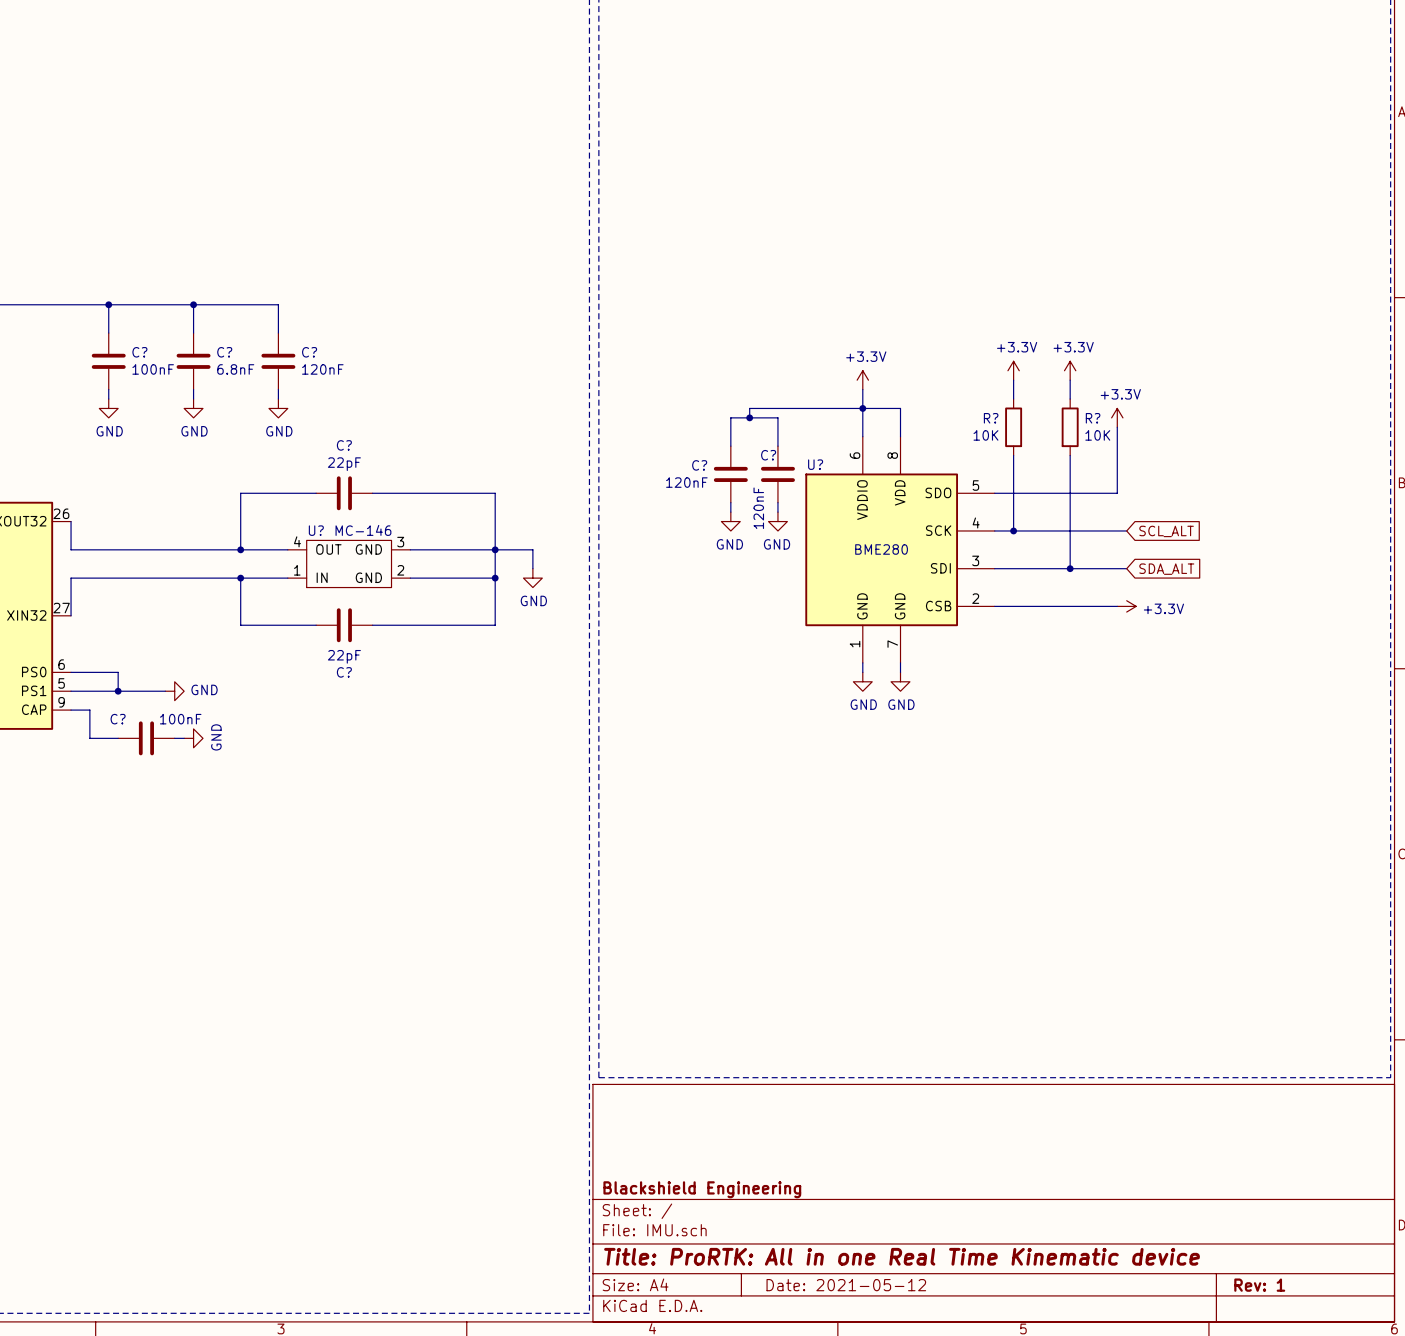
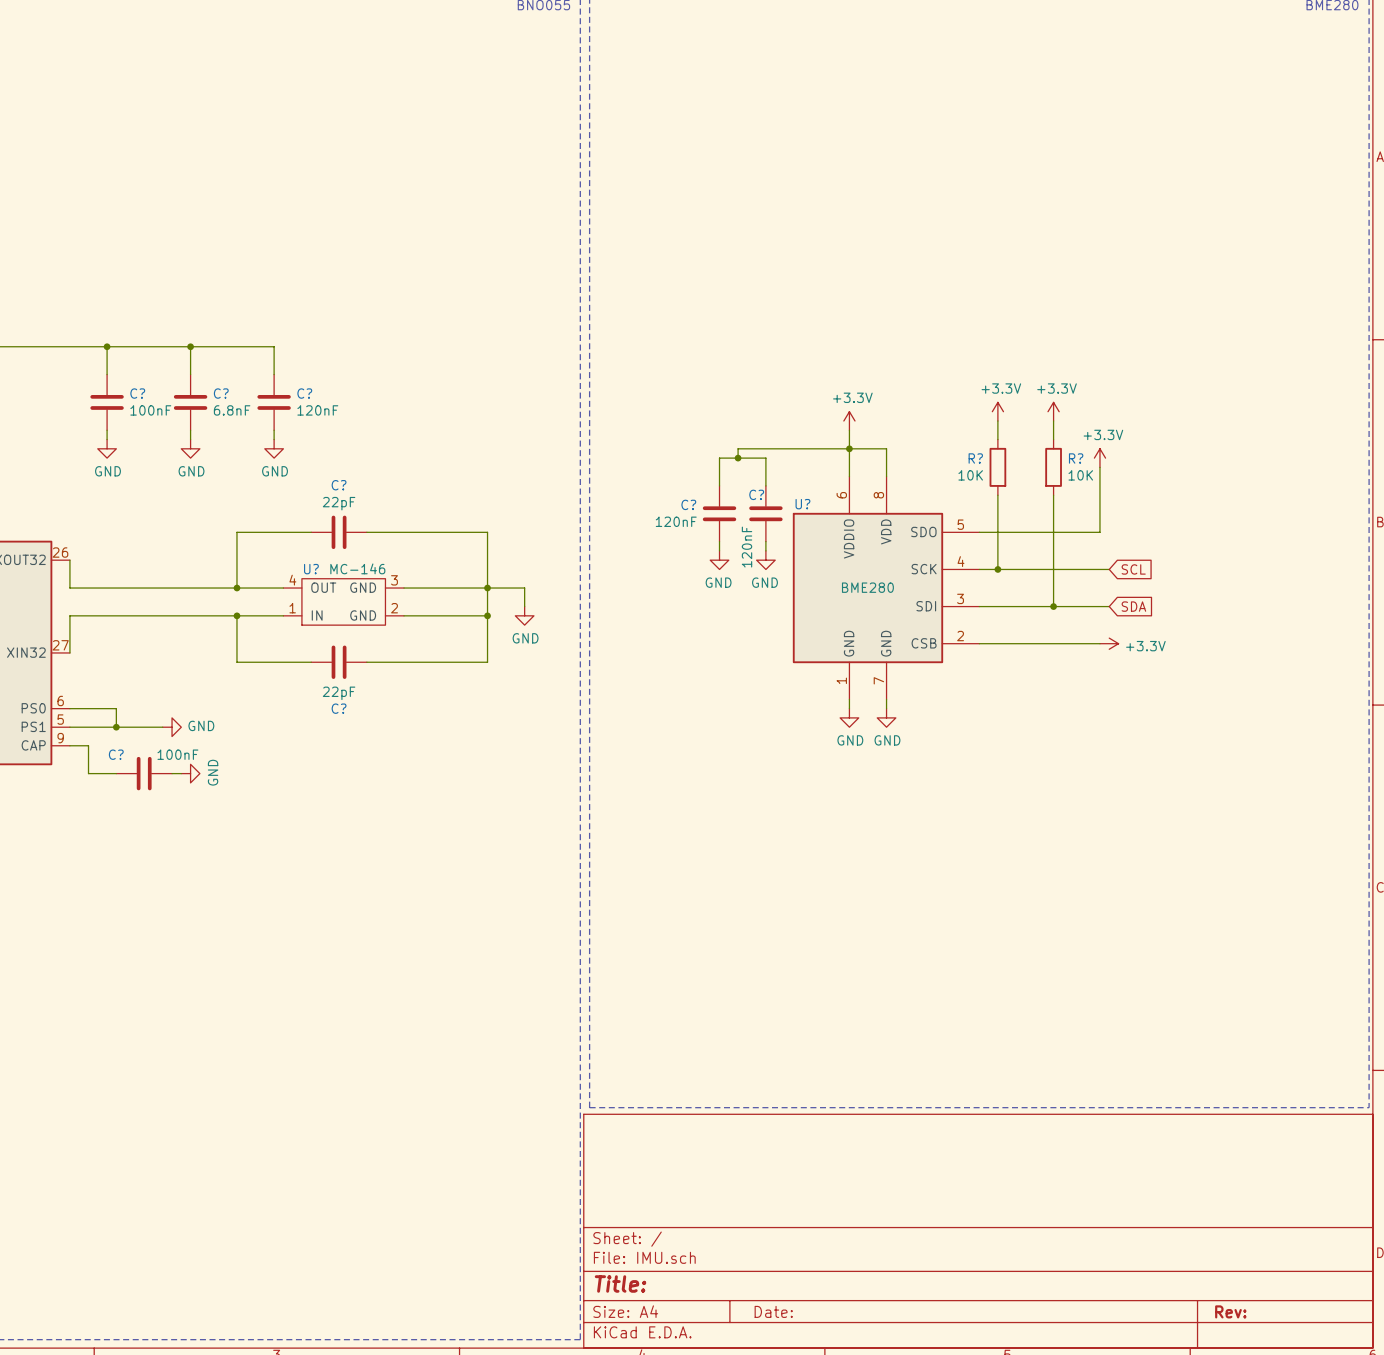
global label: SCL_ALT (1166, 531) -> SCL (1133, 569)
global label: SDA_ALT (1166, 569) -> SDA (1133, 606)
title block: Blackshield Engineering (702, 1189) -> none
title block: Title: ProRTK: All in one Real Time Kinematic device (902, 1256) -> Title: (620, 1283)
title block: Date: 2021-05-12 (846, 1285) -> Date: (773, 1311)
title block: Rev: 1 (1259, 1285) -> Rev: (1230, 1311)

